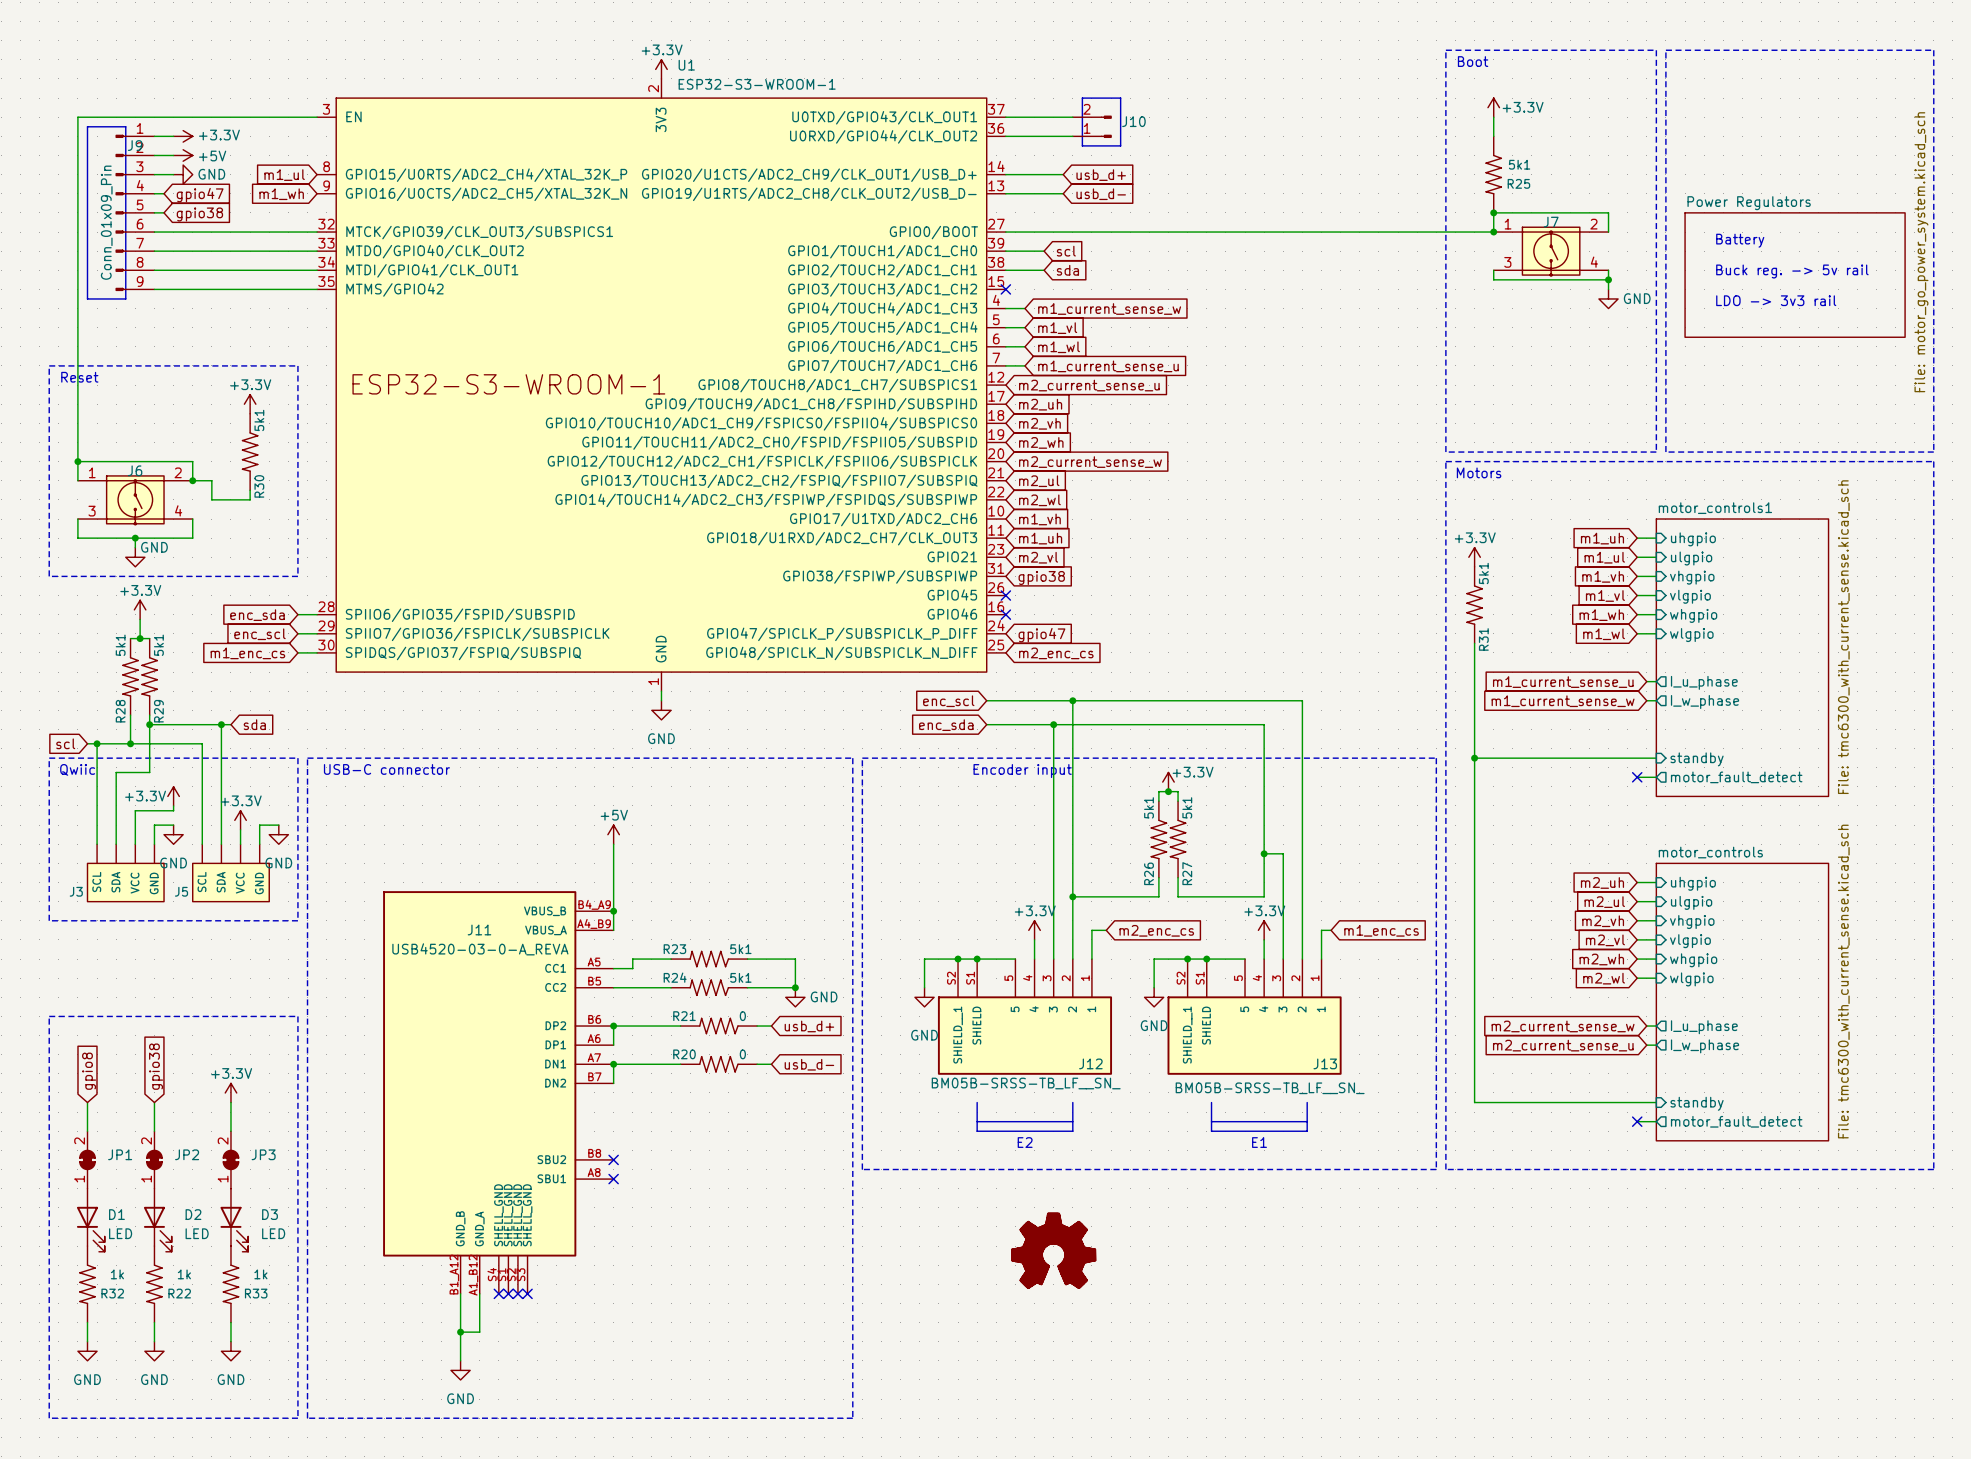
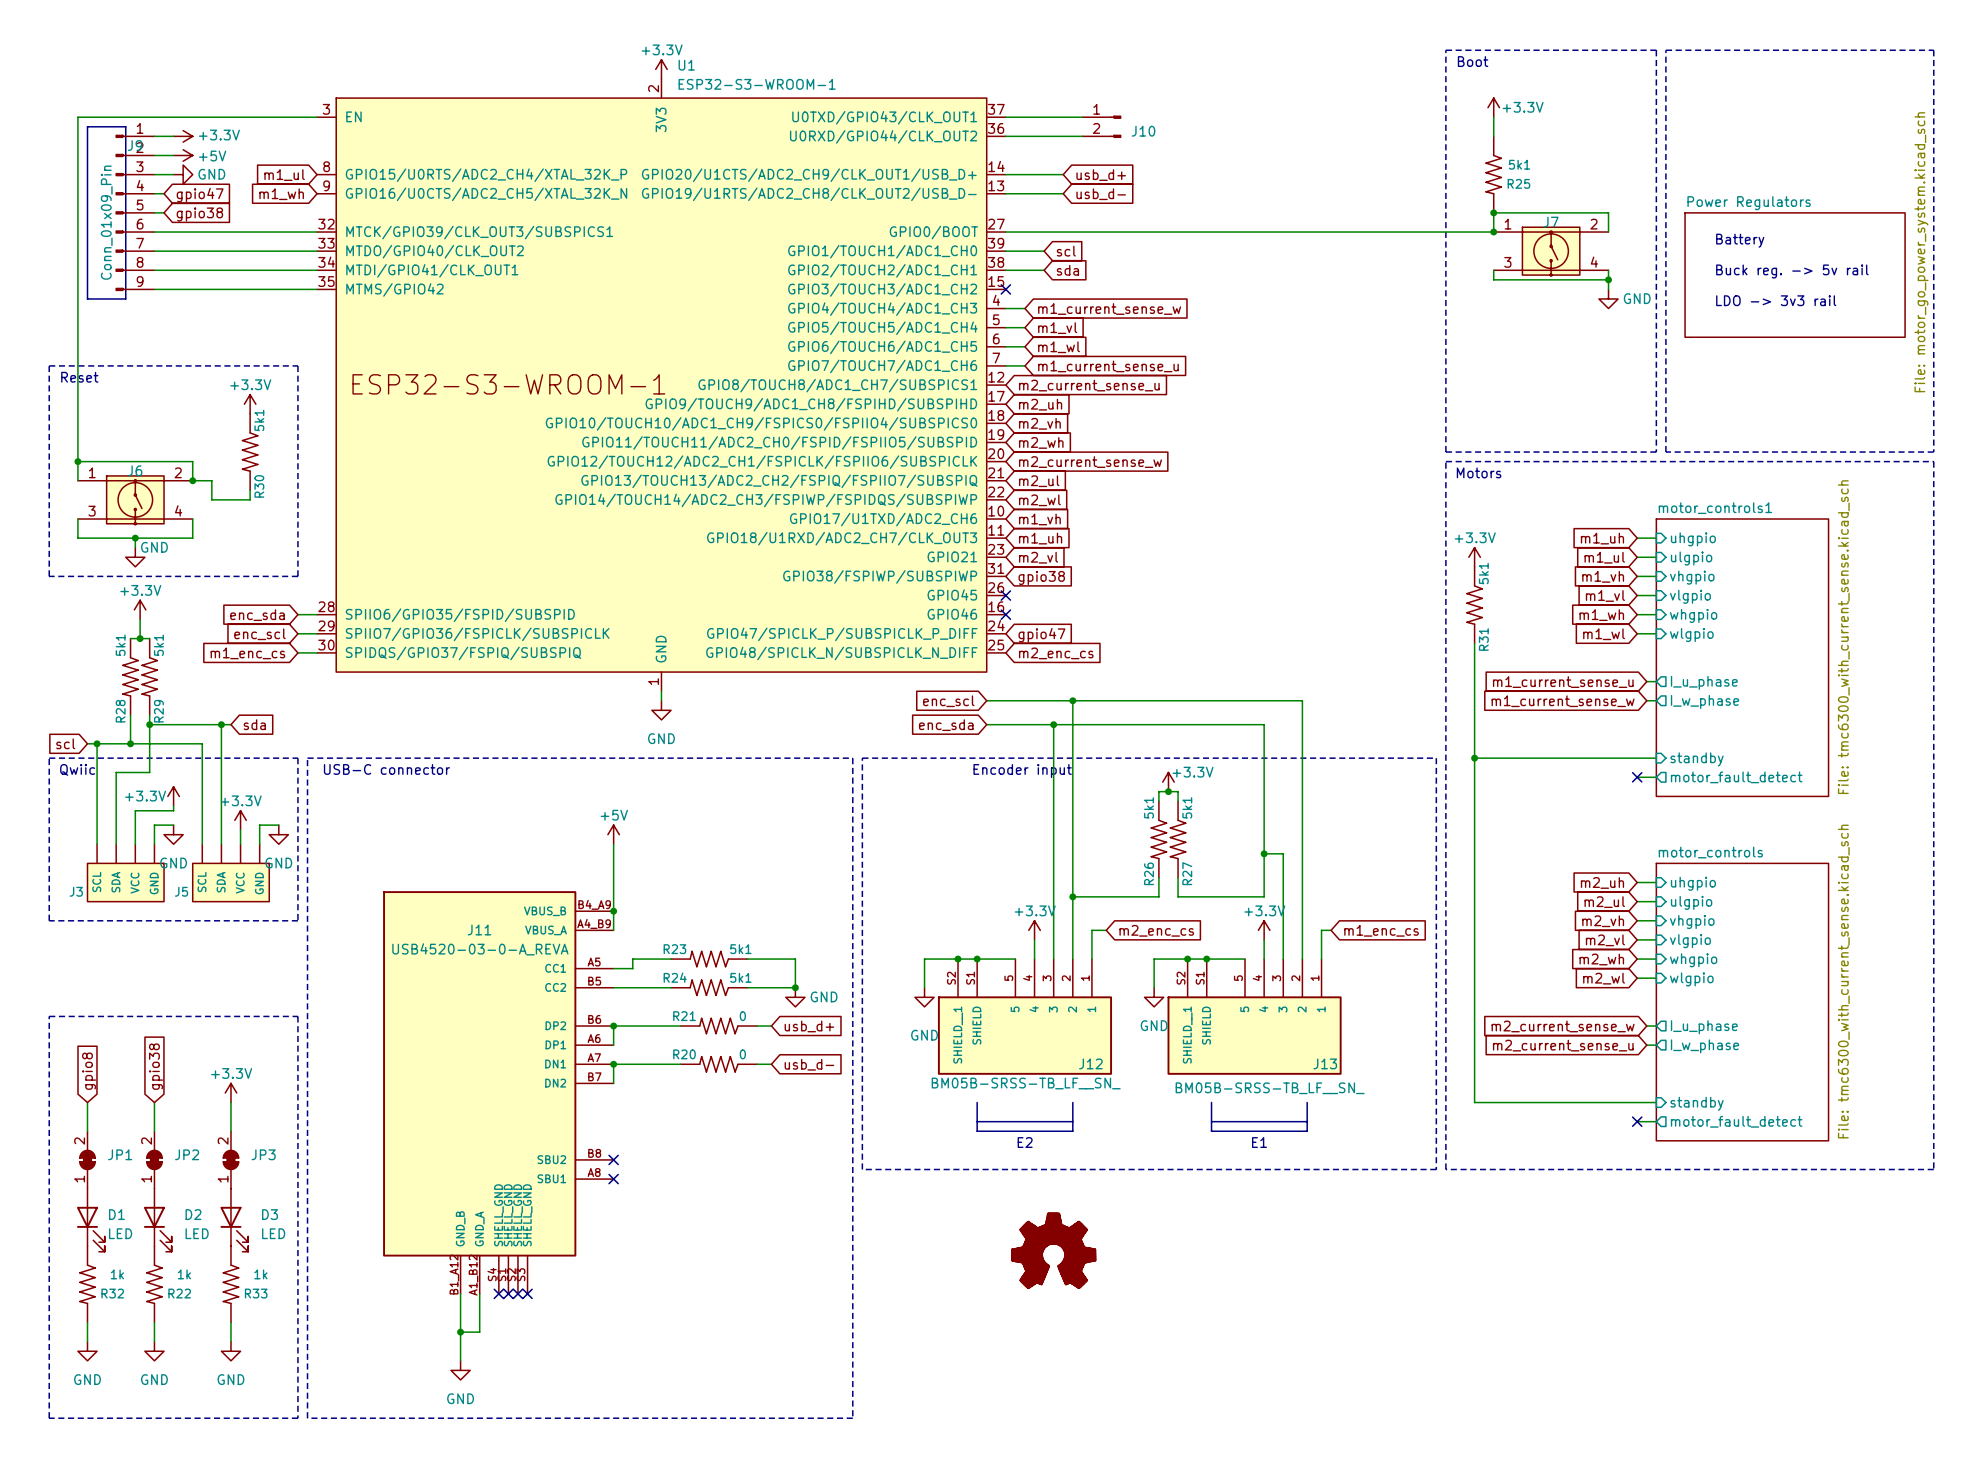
line: (1082, 98) (1120, 98) (1120, 145) (1082, 145) (1082, 98) -> none
J10 flip: as is (1106, 126) -> up-down (1115, 126)

